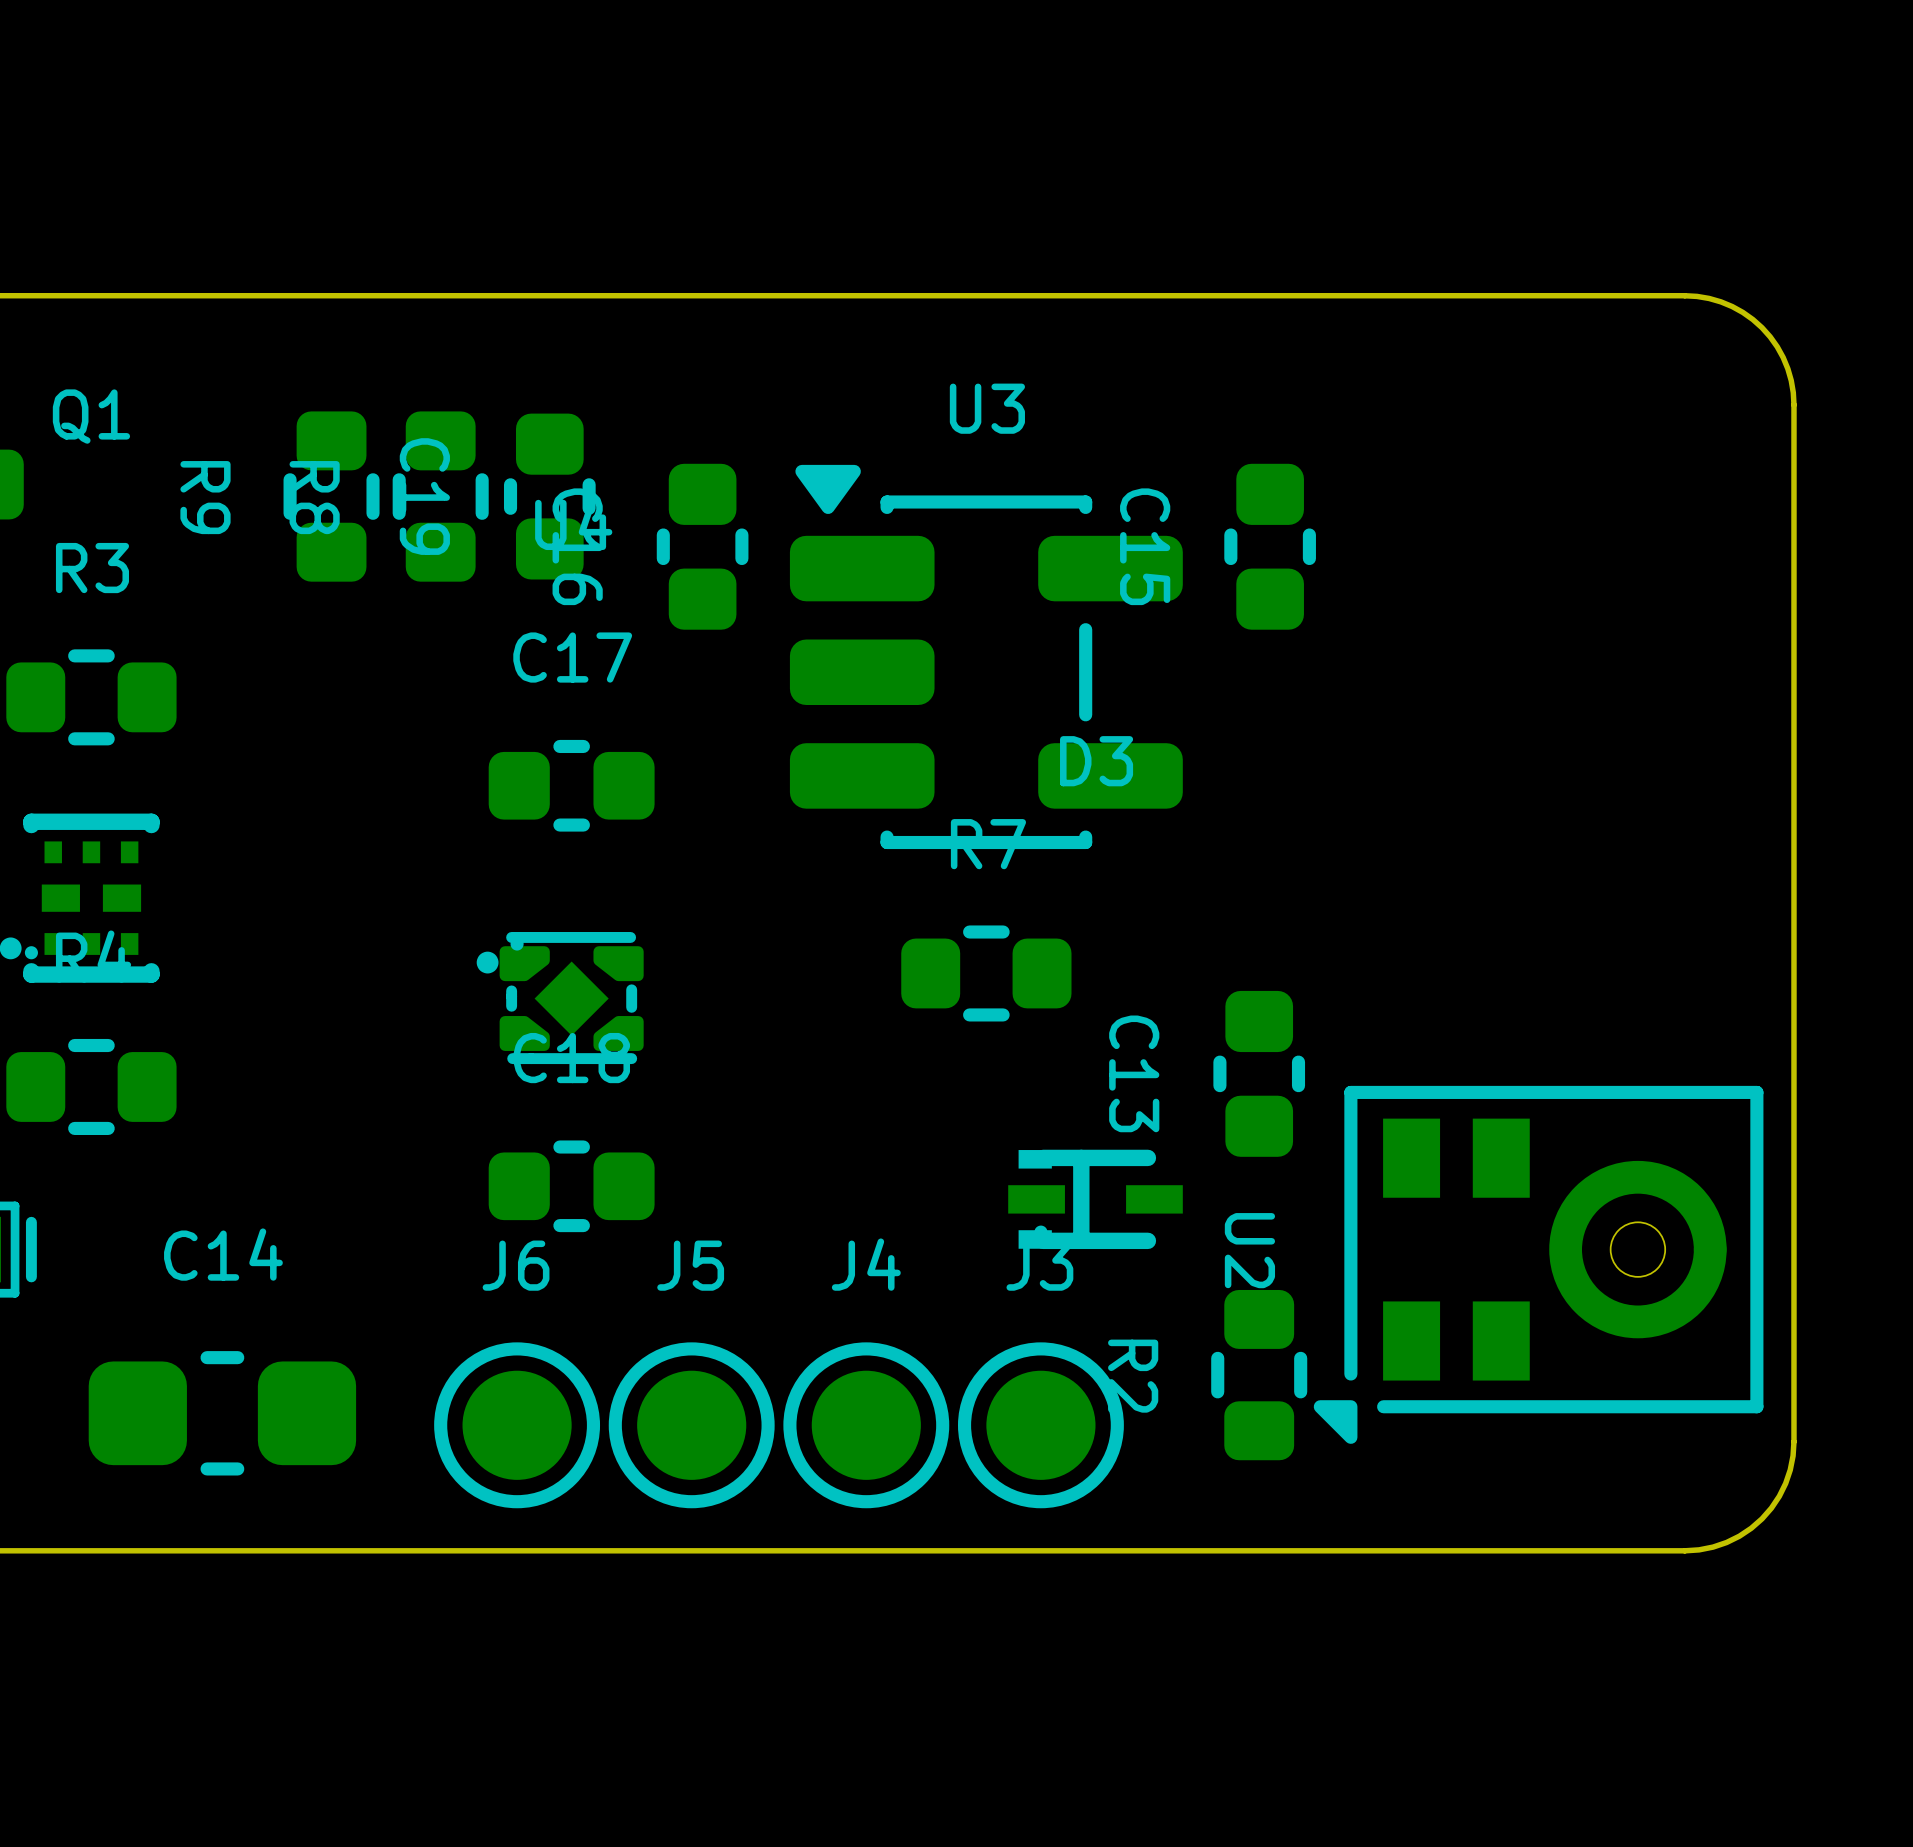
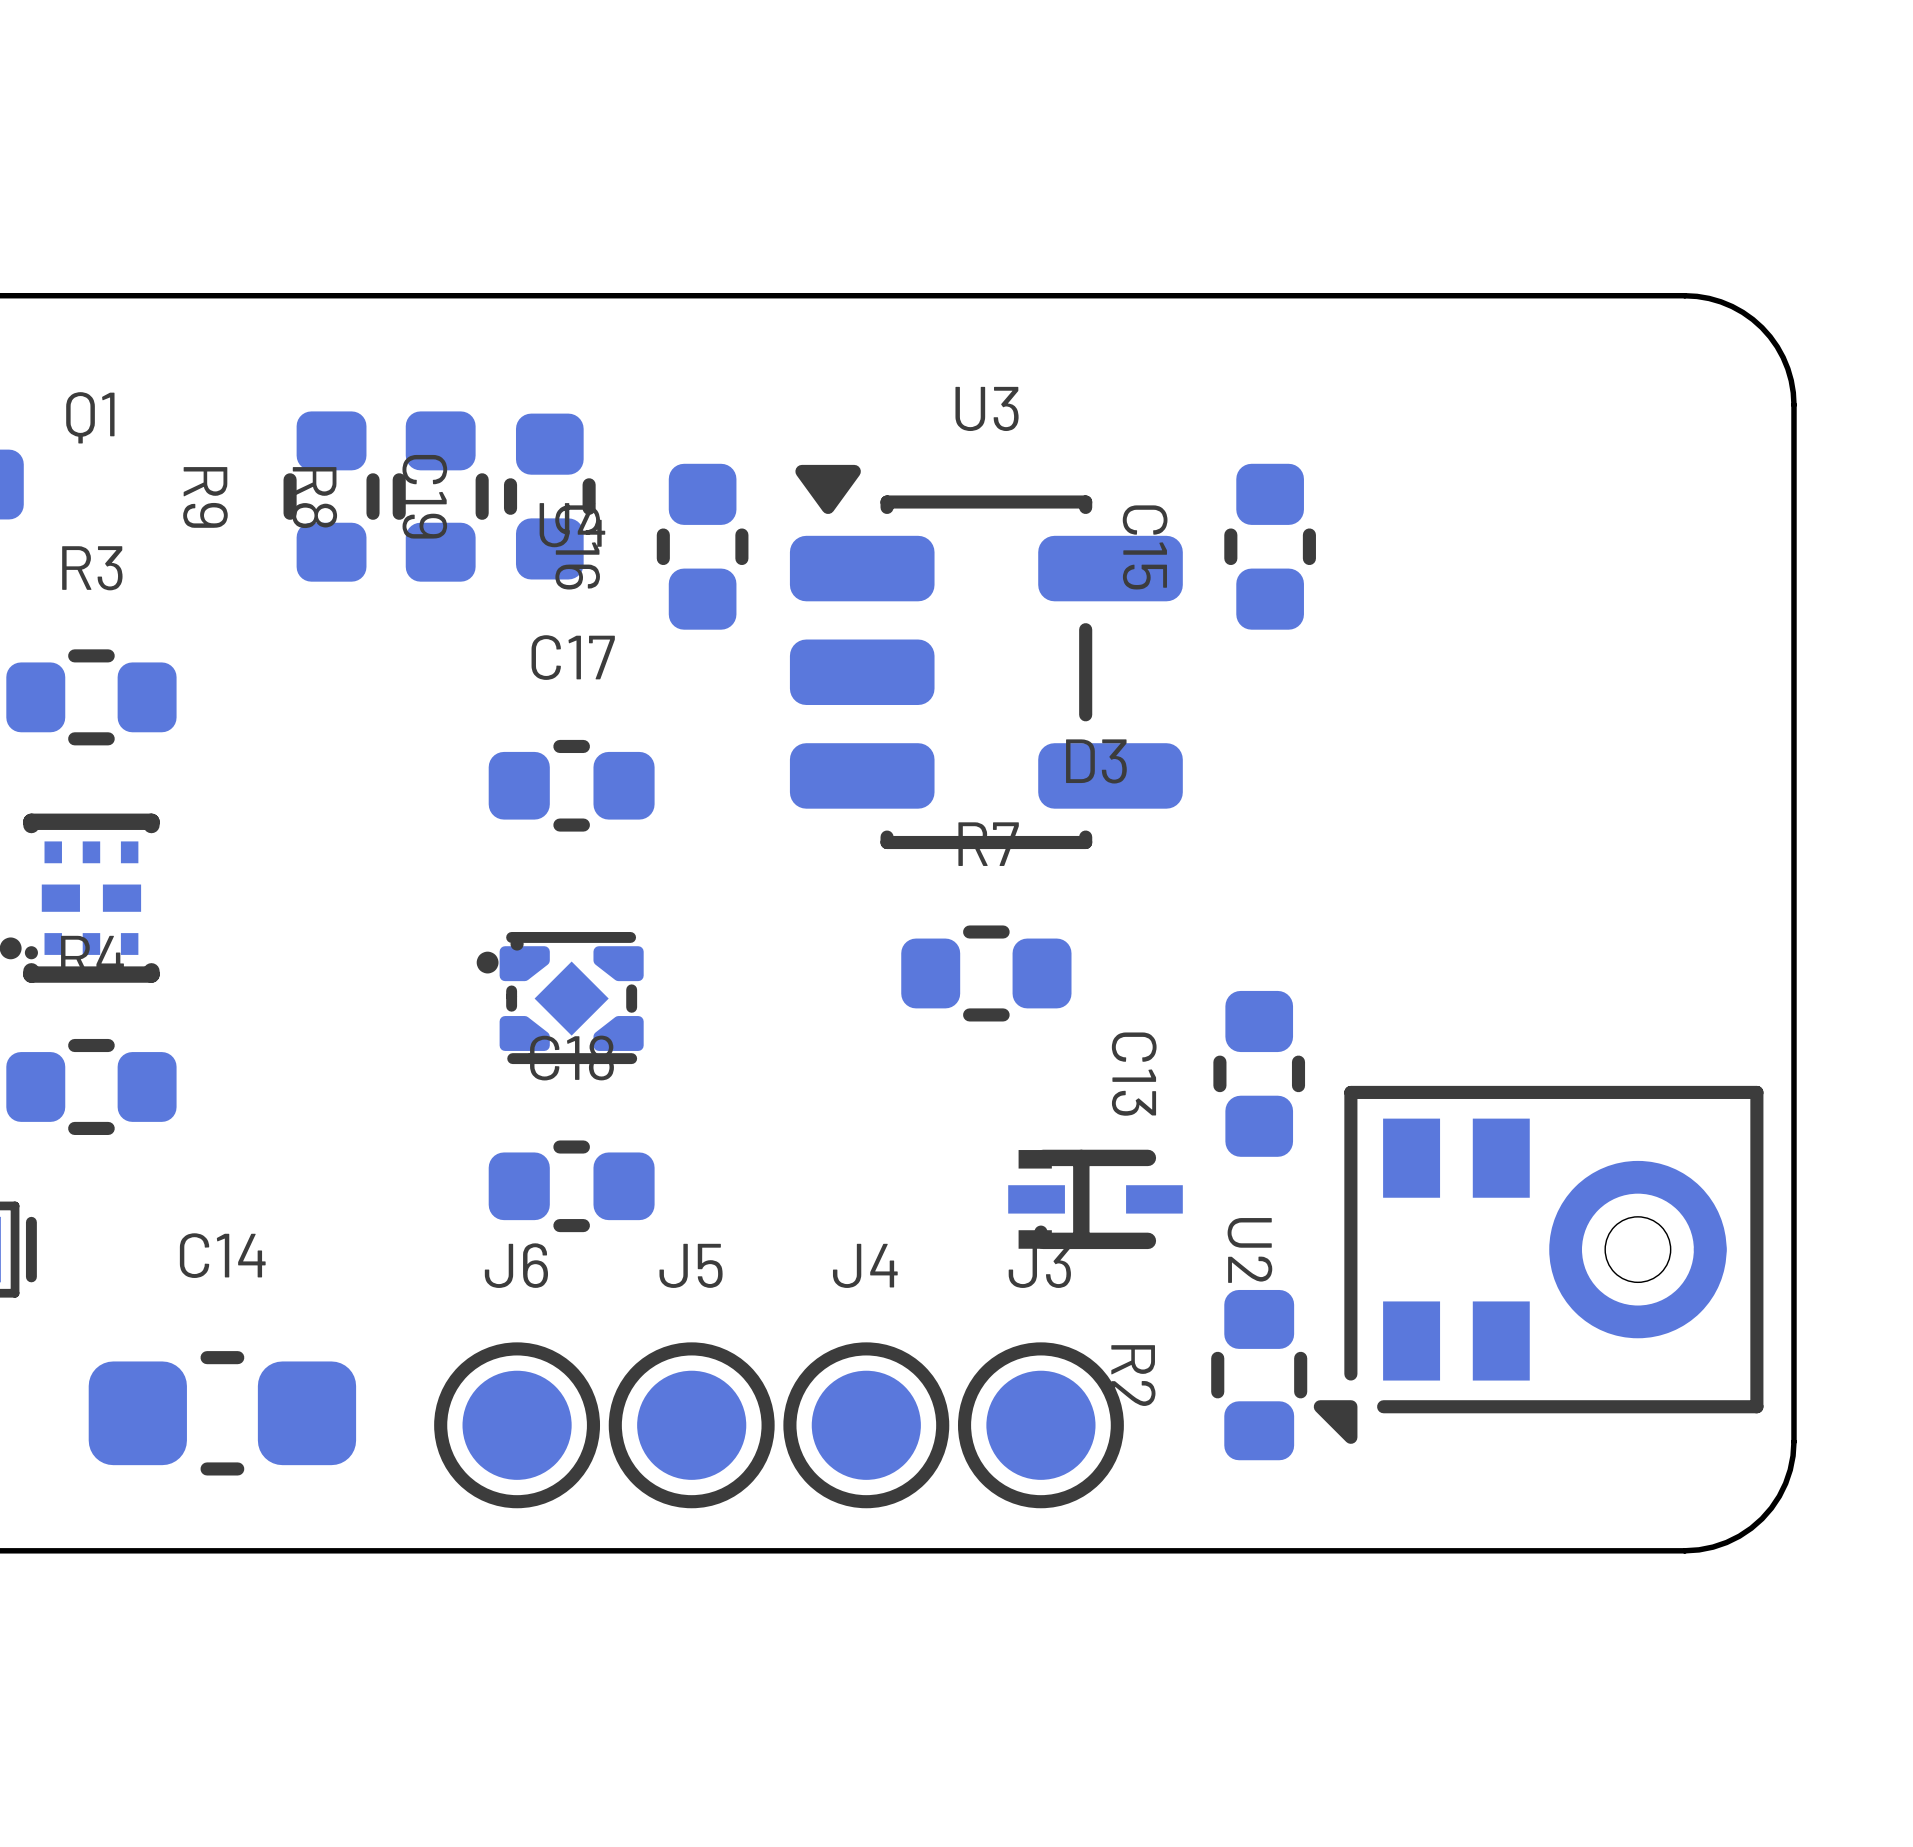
U2 footprint: [1313, 1085, 1764, 1444] -> [1313, 1085, 1764, 1444]

